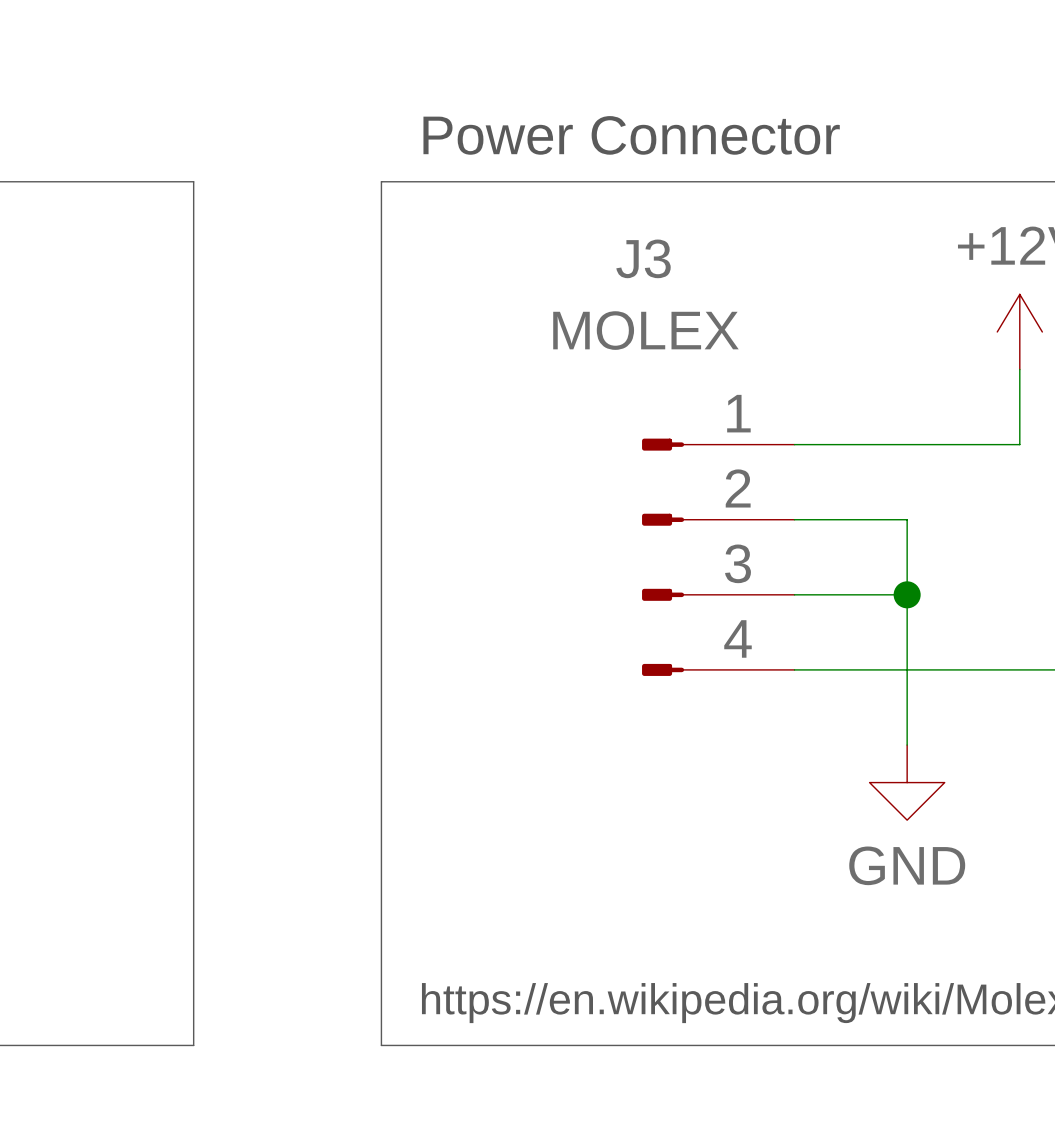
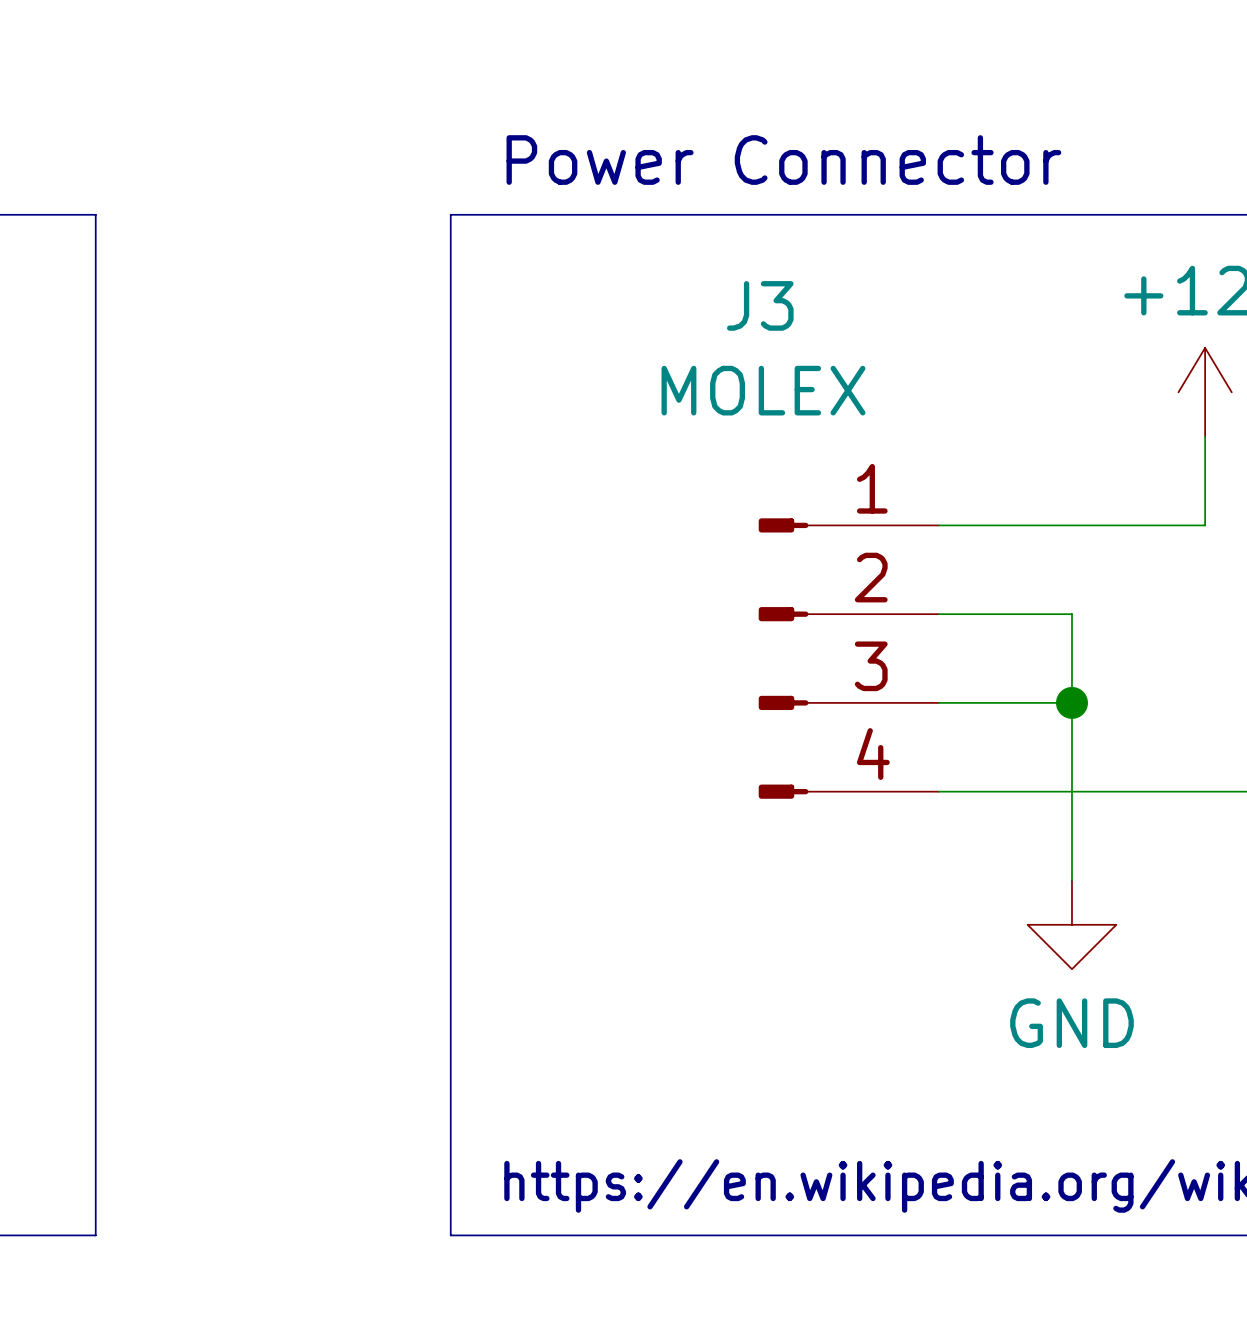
line: (81, 181) (193, 181) (193, 1045) (81, 1045) -> (95, 214) (95, 1235)

